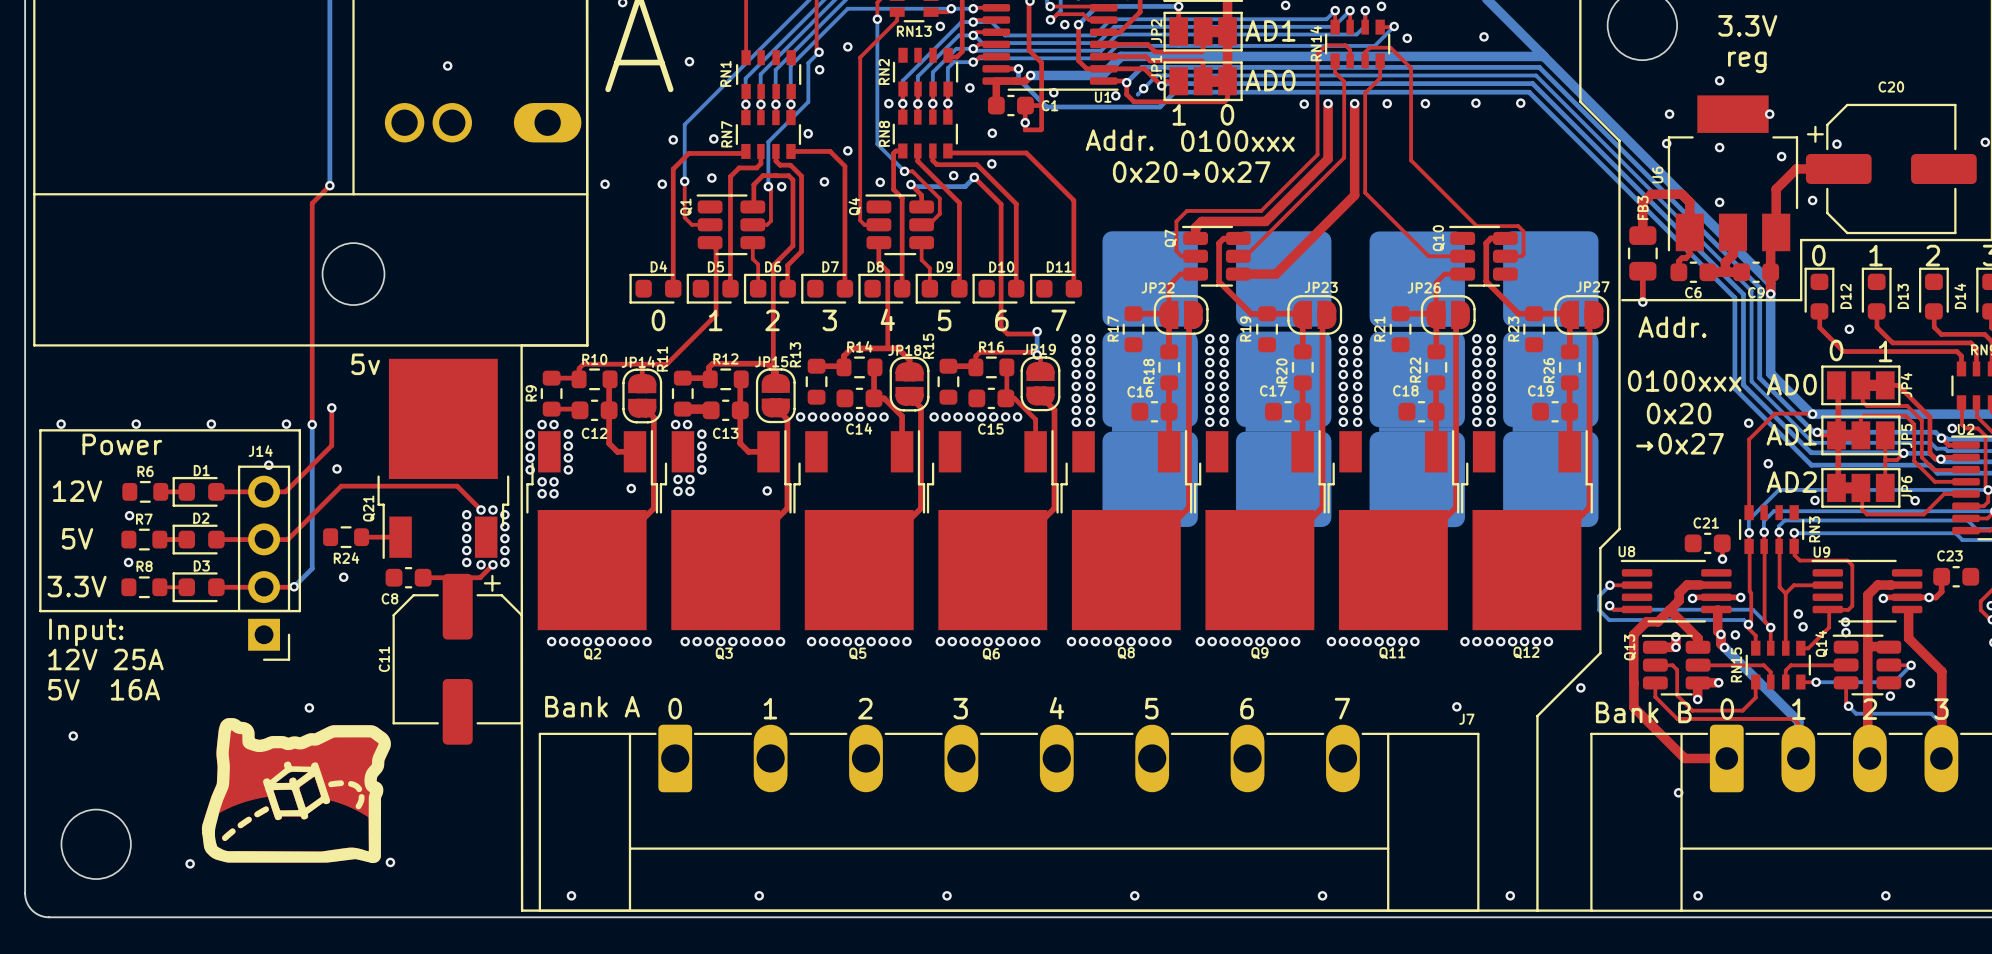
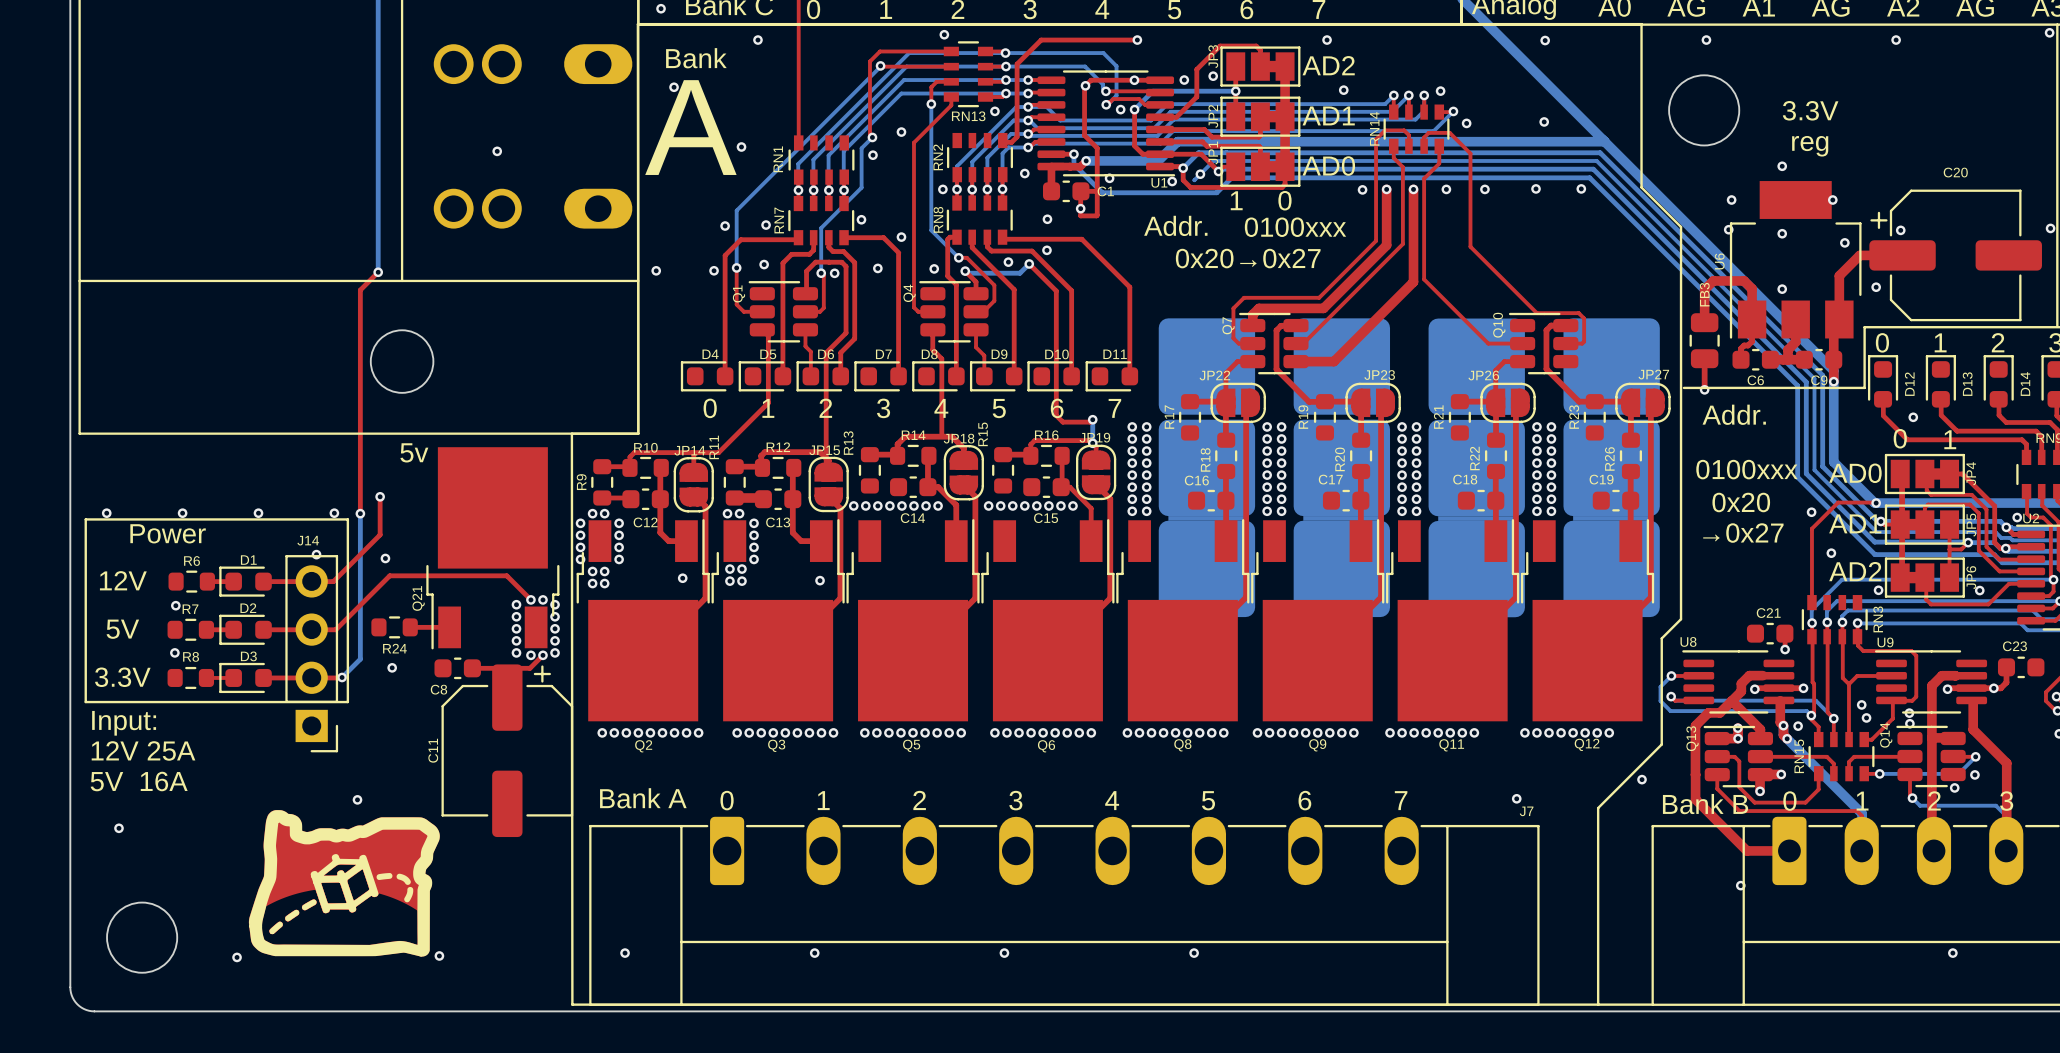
via position: (571, 895) -> (625, 953)
via position: (759, 895) -> (814, 953)
via position: (947, 895) -> (1004, 953)
via position: (1134, 895) -> (1194, 953)
via: (1322, 895) -> none
via: (1510, 895) -> none
via: (1698, 895) -> none
via position: (1885, 895) -> (1952, 953)

